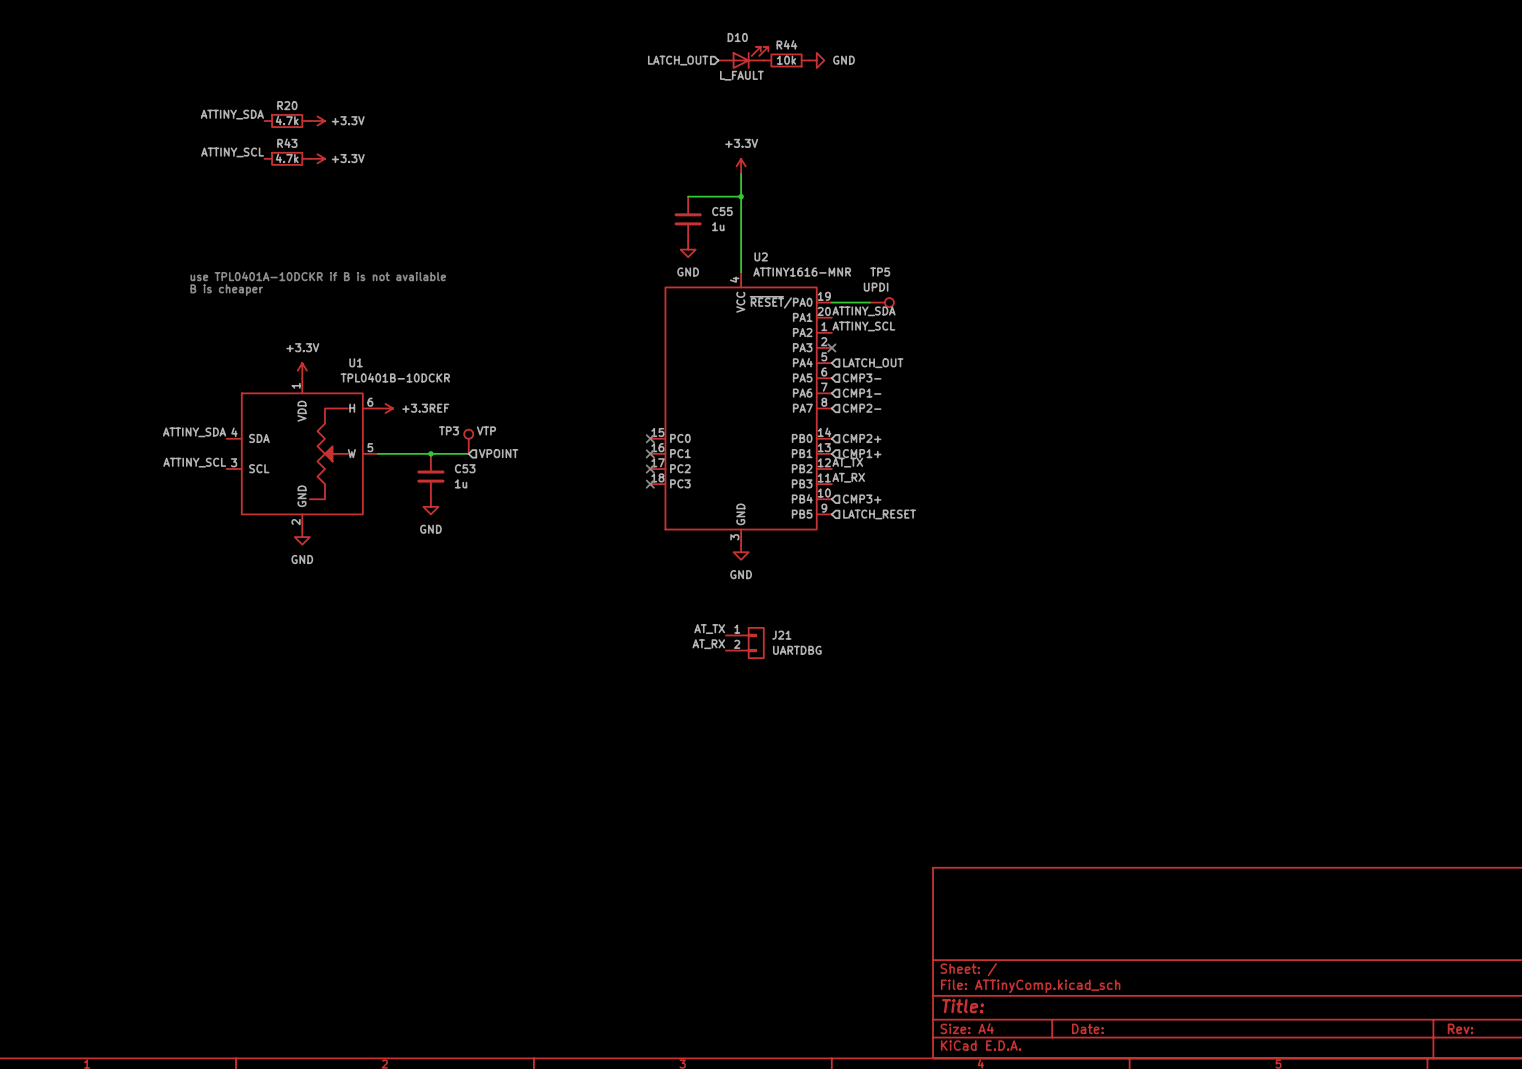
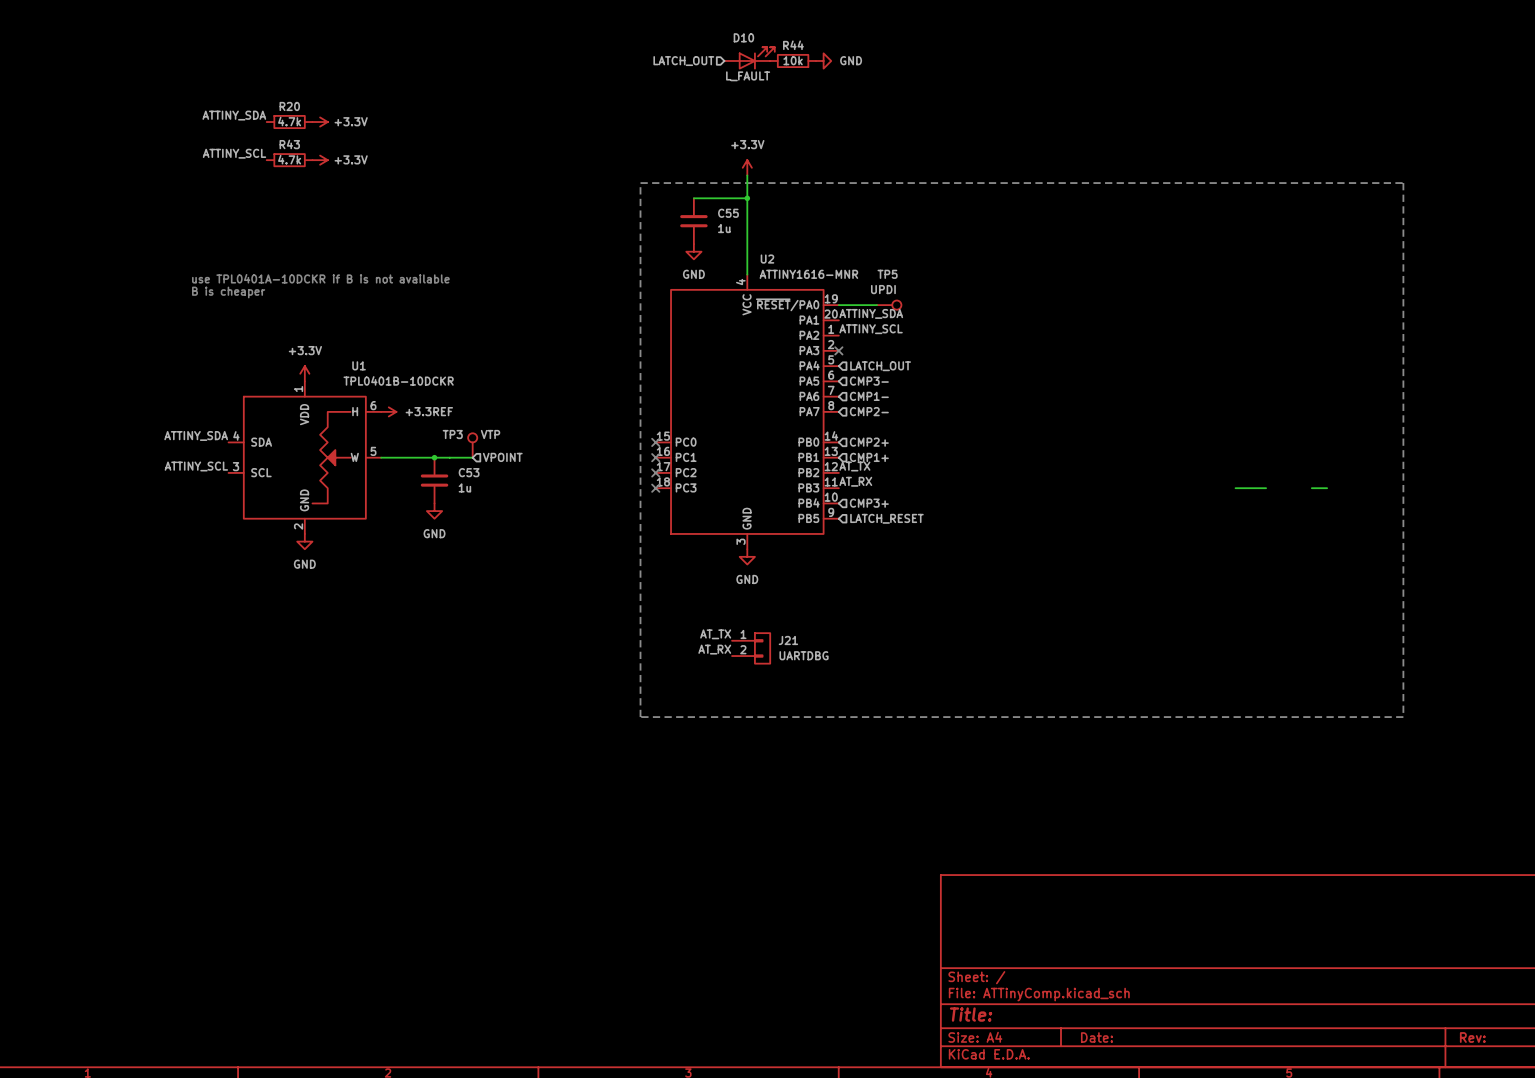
line: none -> (640, 183) (1403, 183) (1403, 717) (640, 717) (640, 183)
wire: none -> (1235, 488) (1266, 488)
wire: none -> (1311, 488) (1327, 488)

